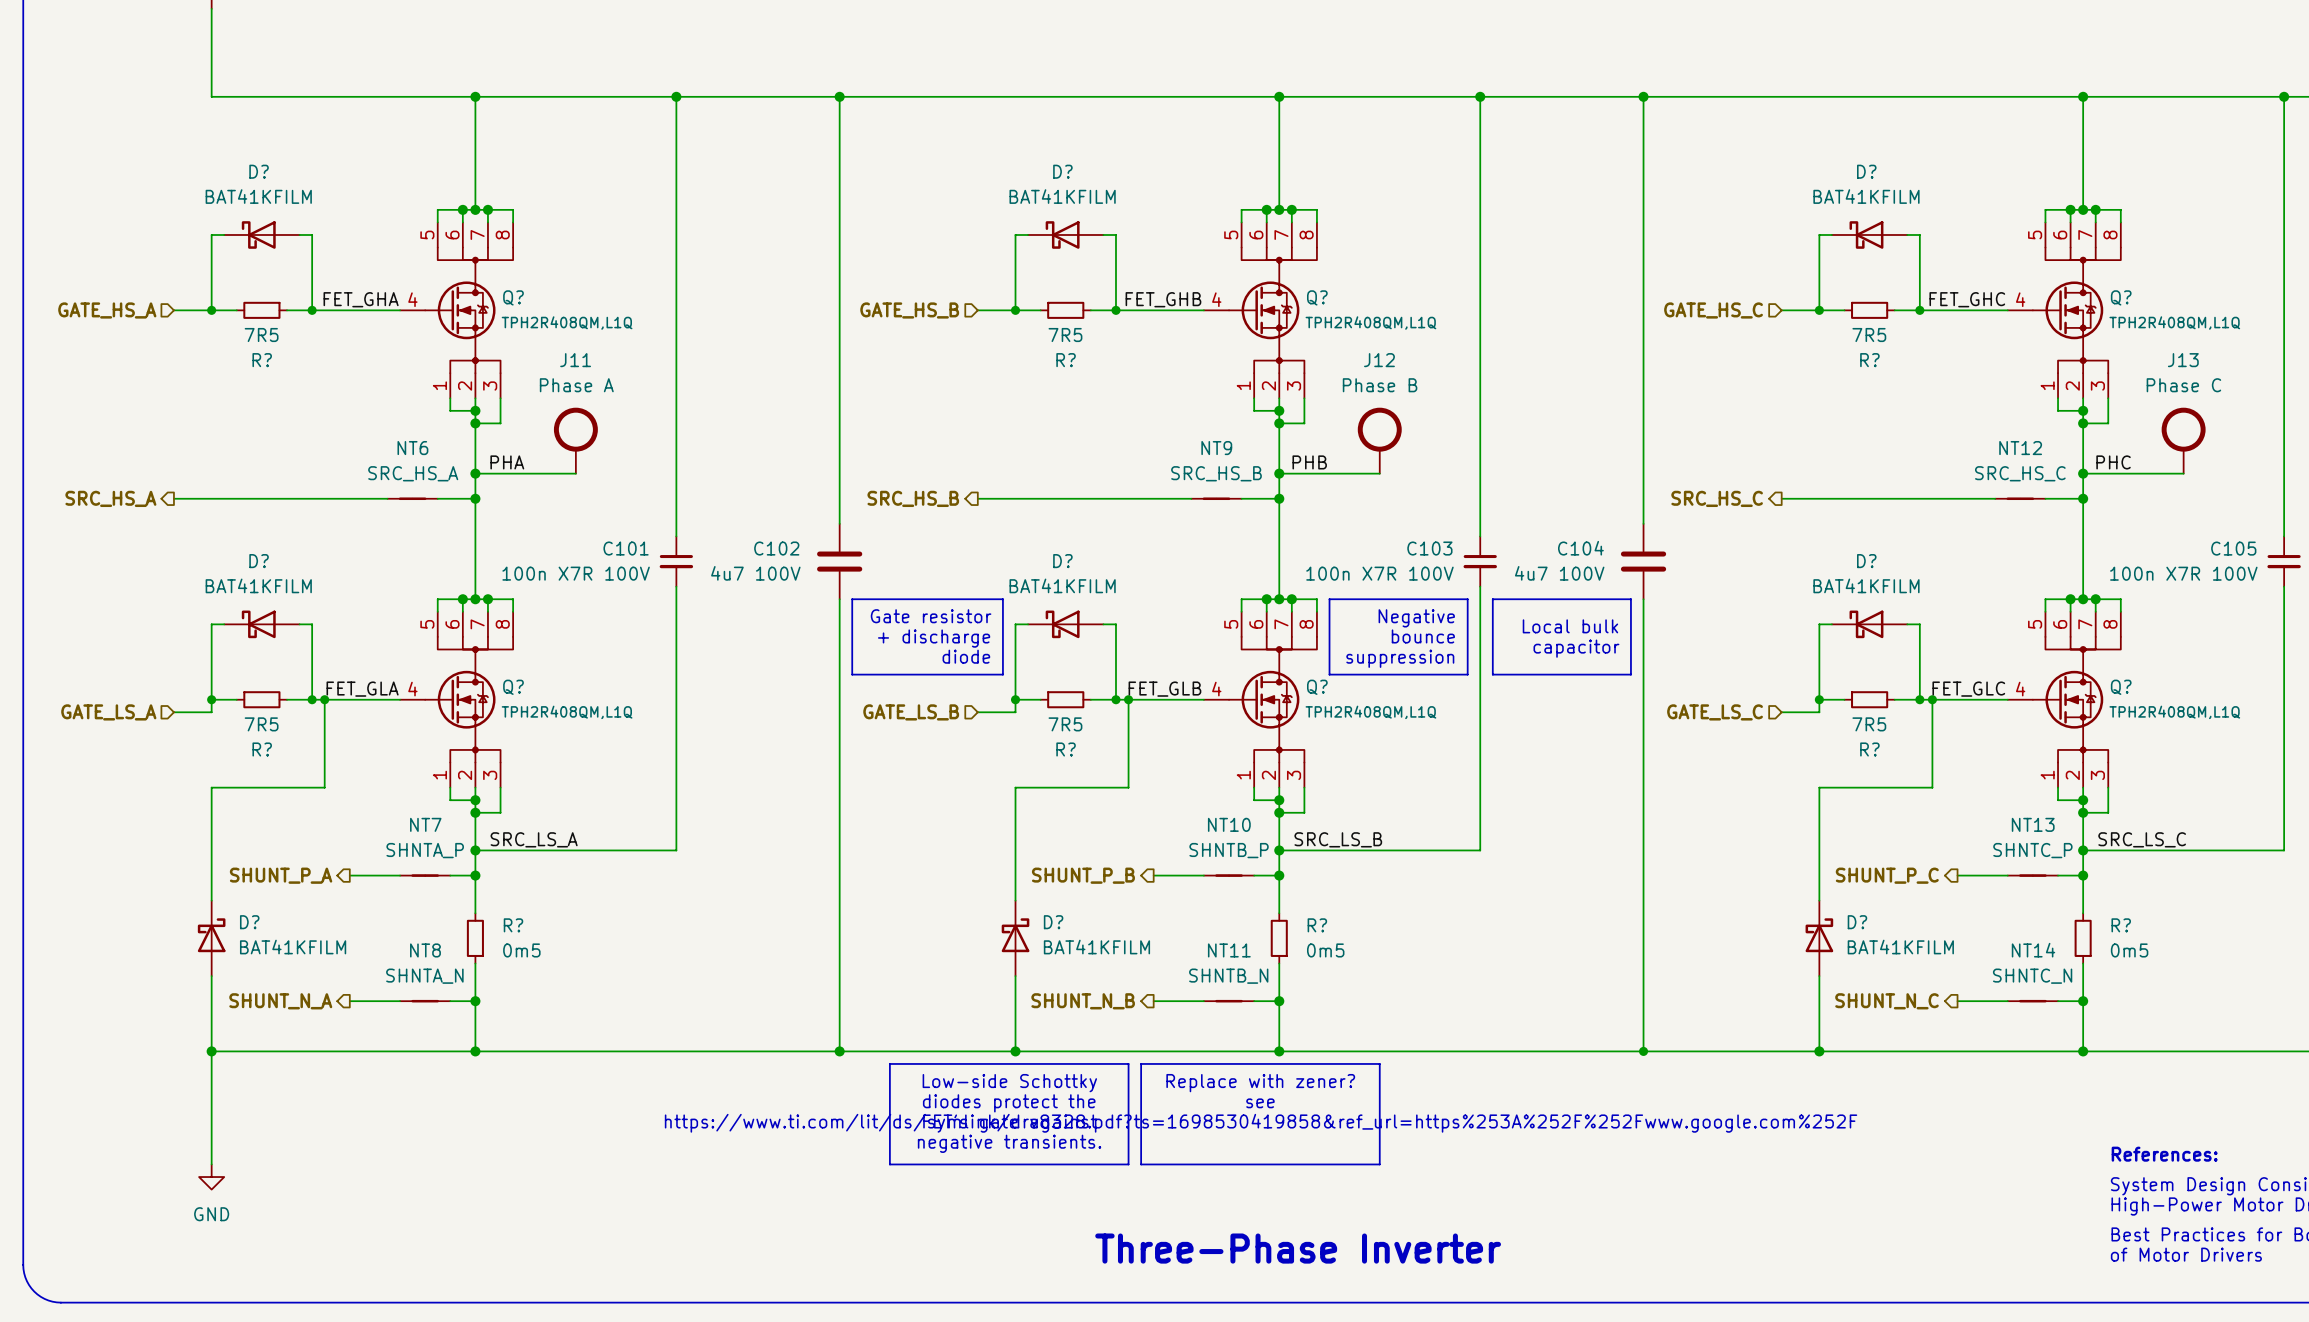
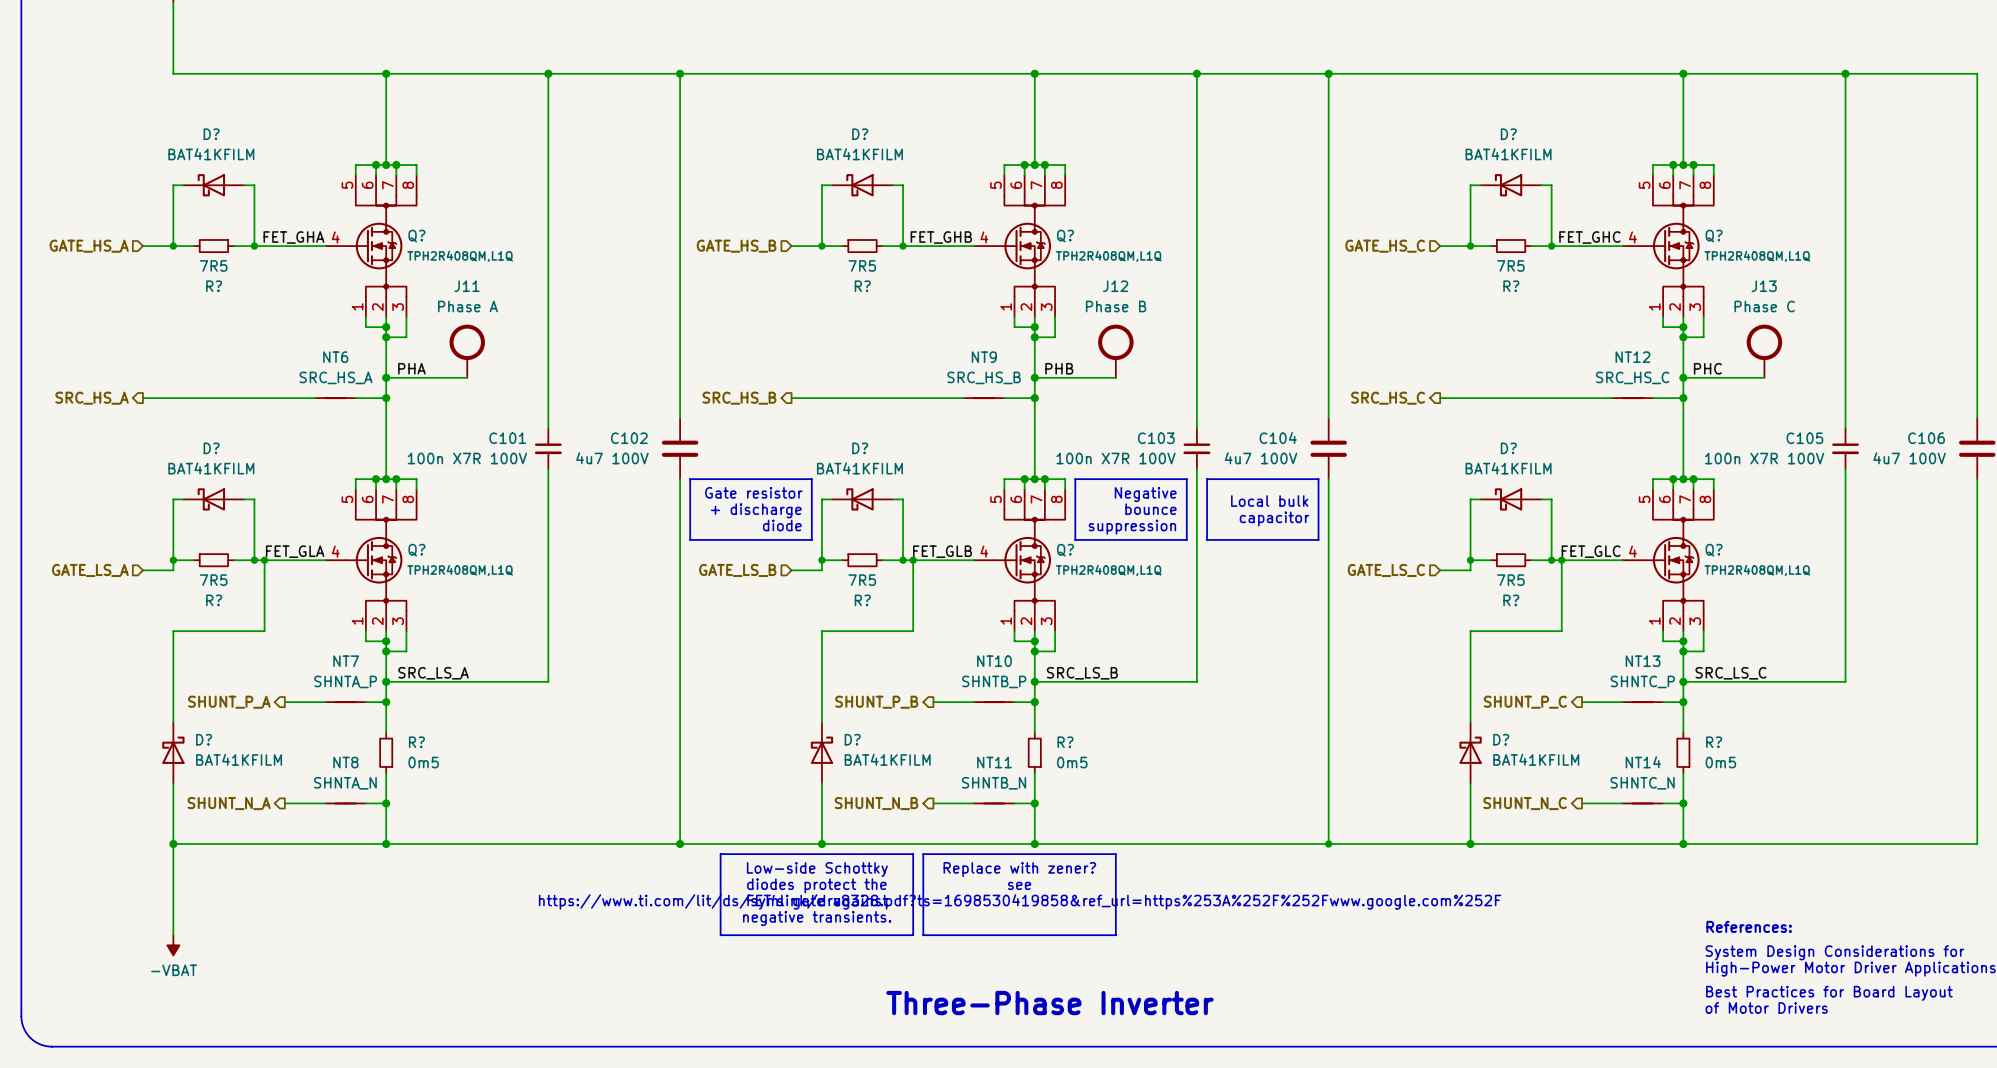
power symbol: GND (211, 1177) -> -VBAT (173, 945)

